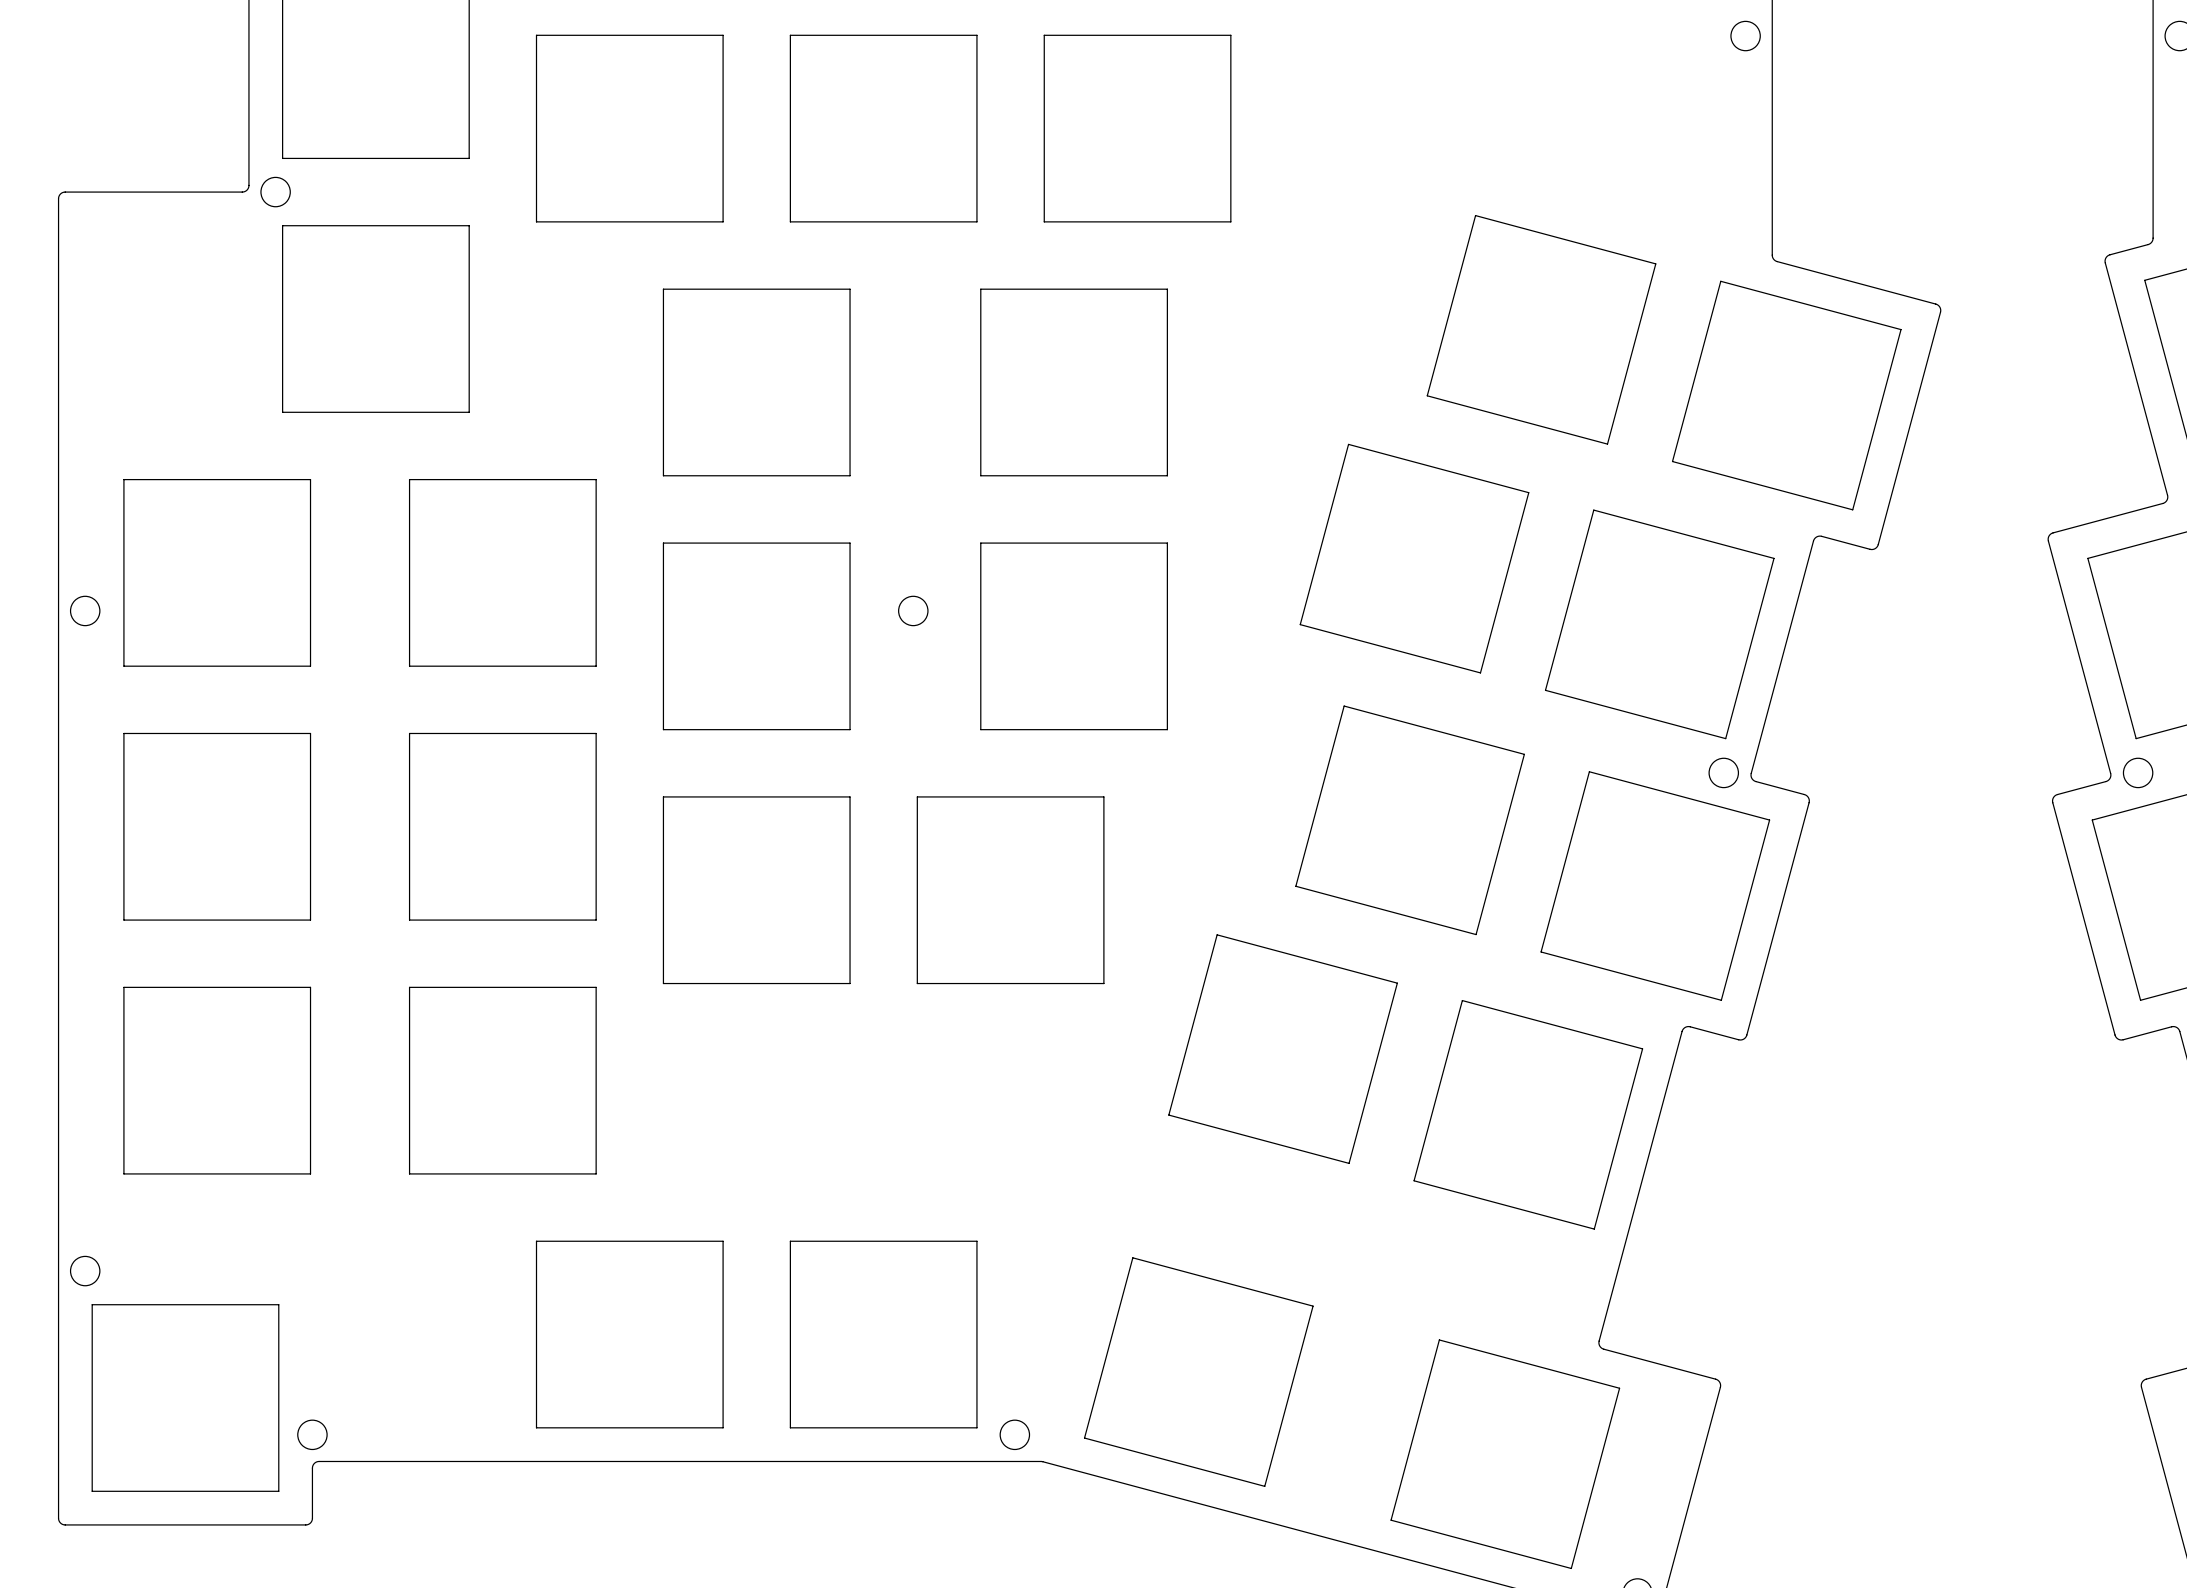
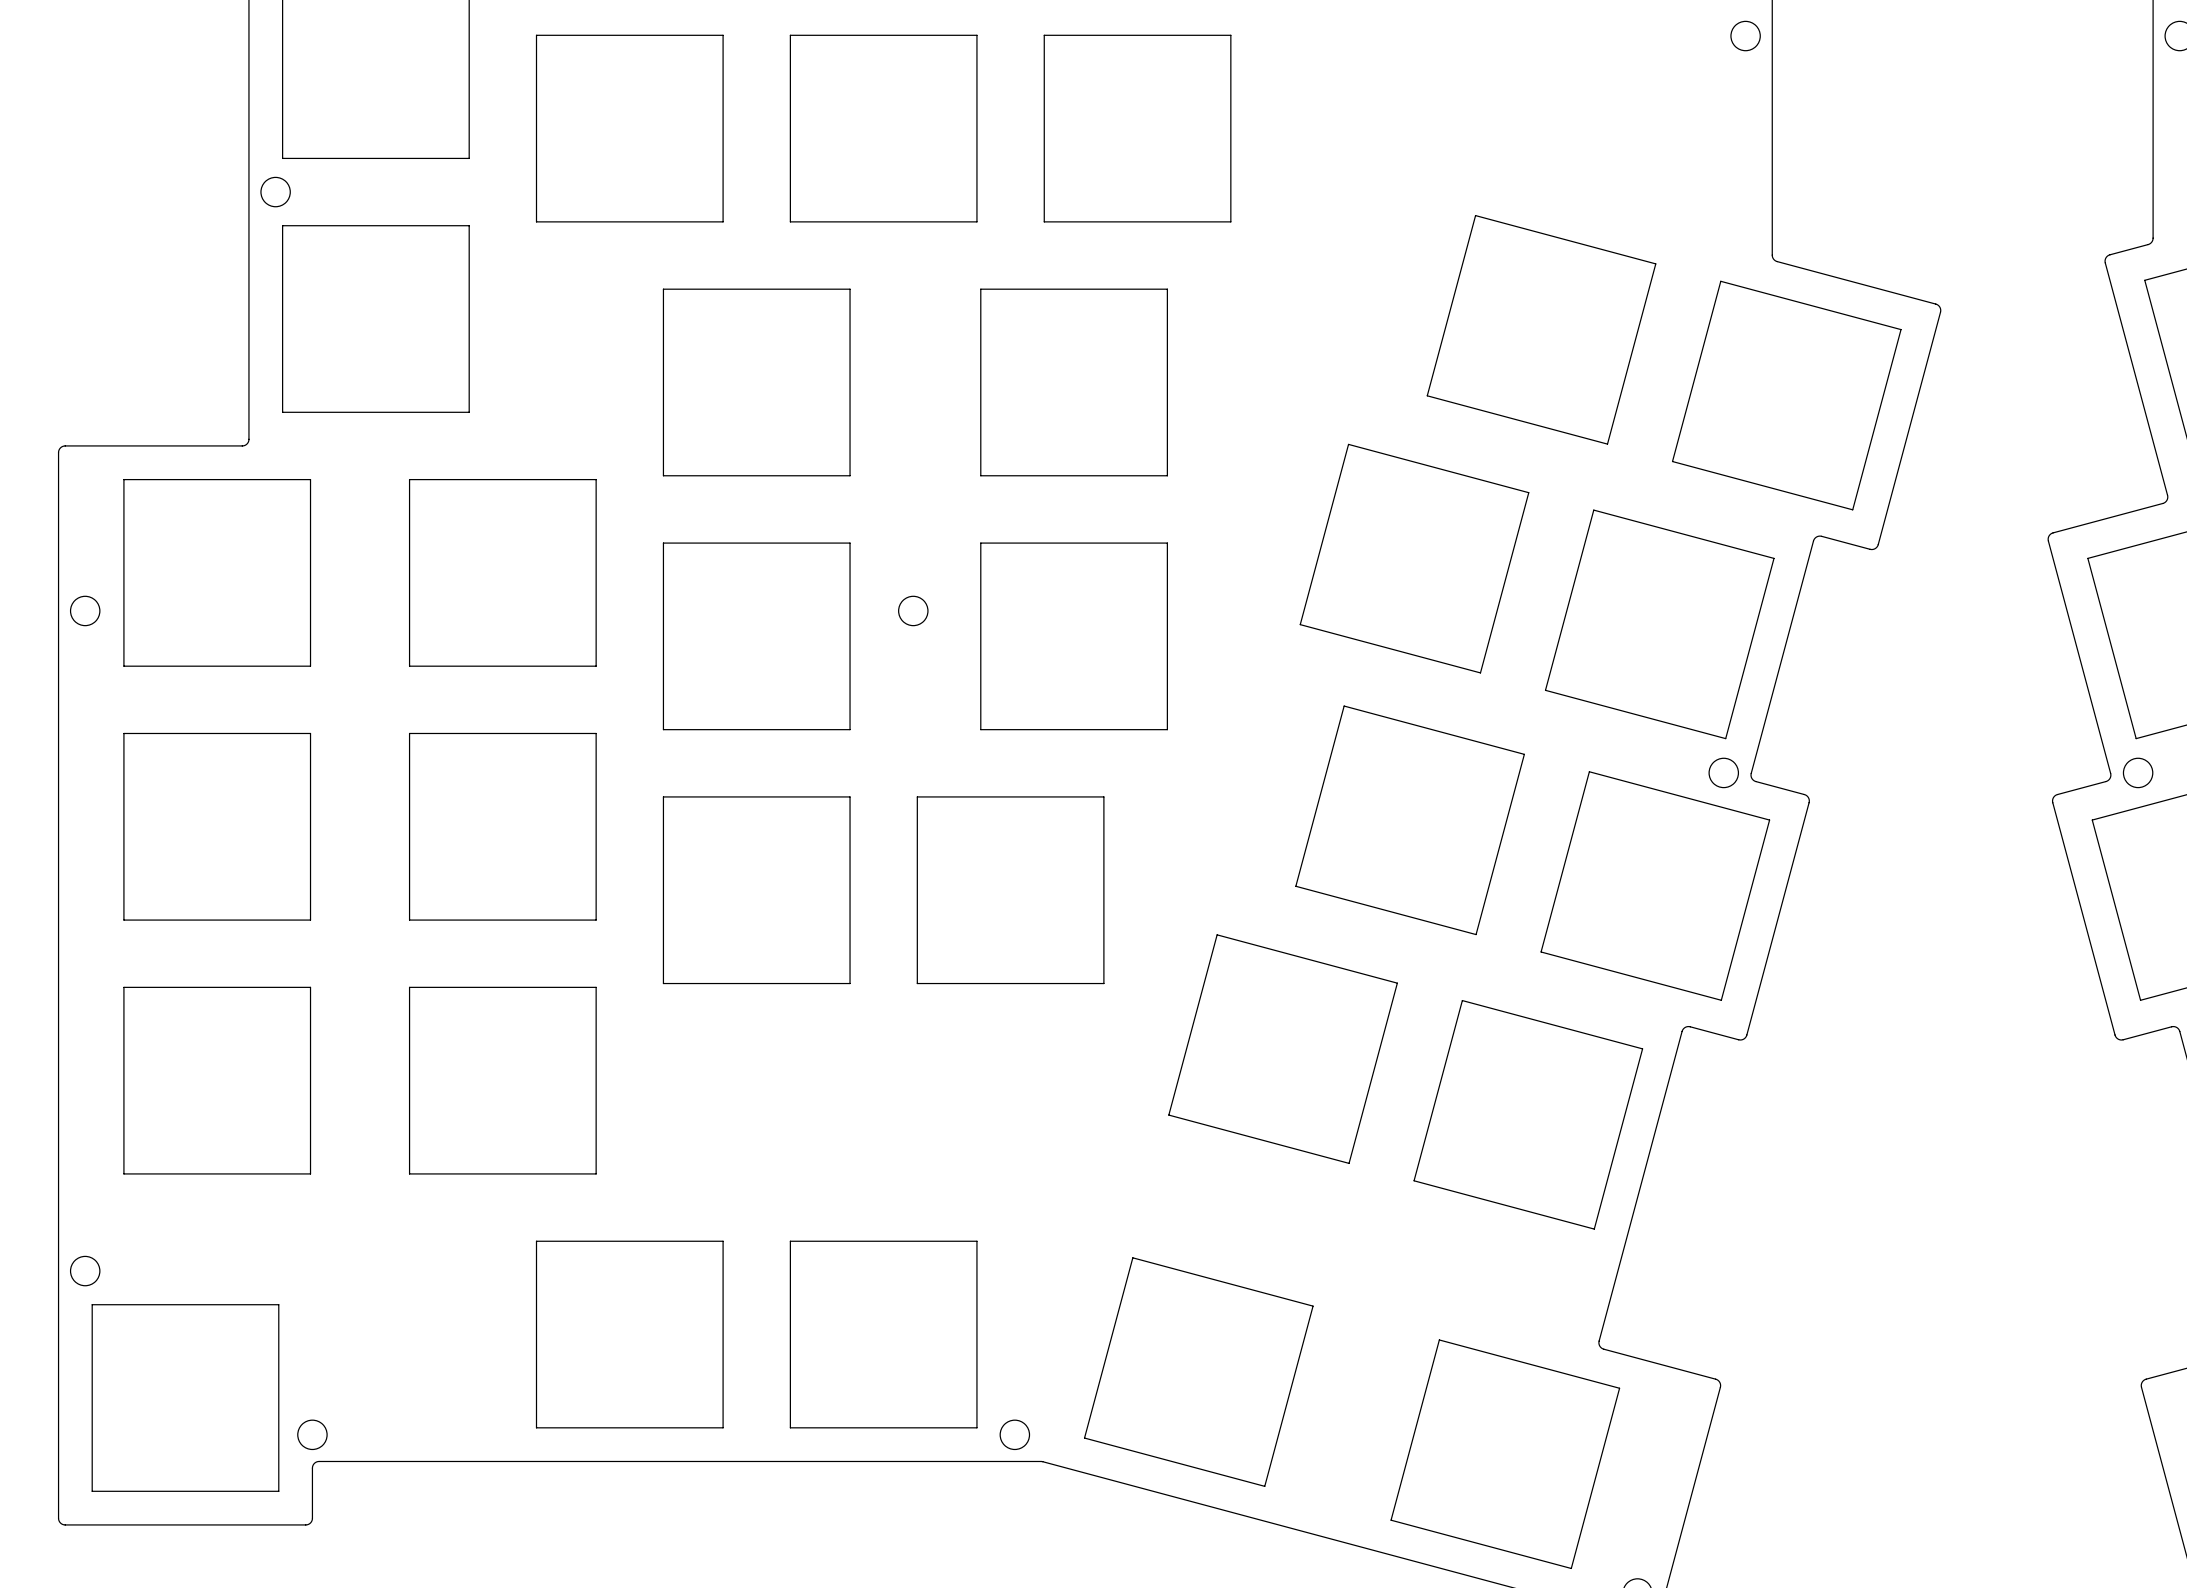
board edge: (248, 185) (247, 190) (242, 192) (65, 192) (59, 194) (58, 452) -> (248, 185) (247, 443) (242, 445) (65, 445) (60, 447) (58, 452)

